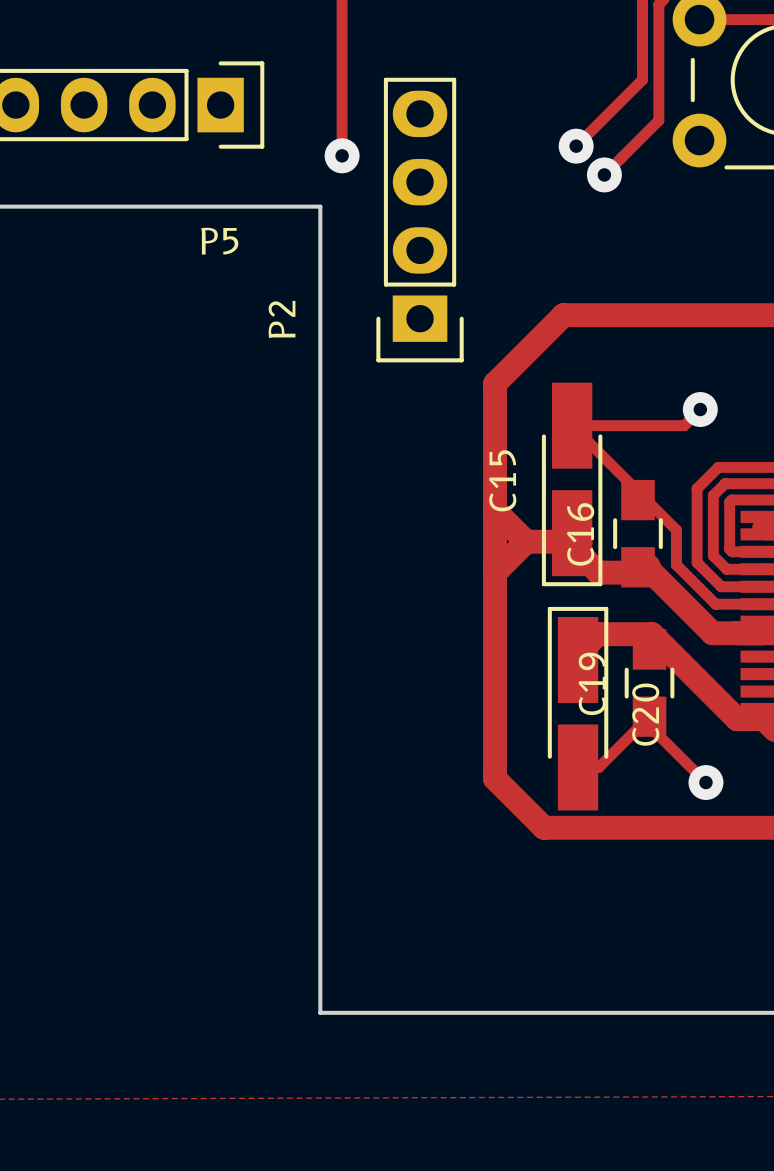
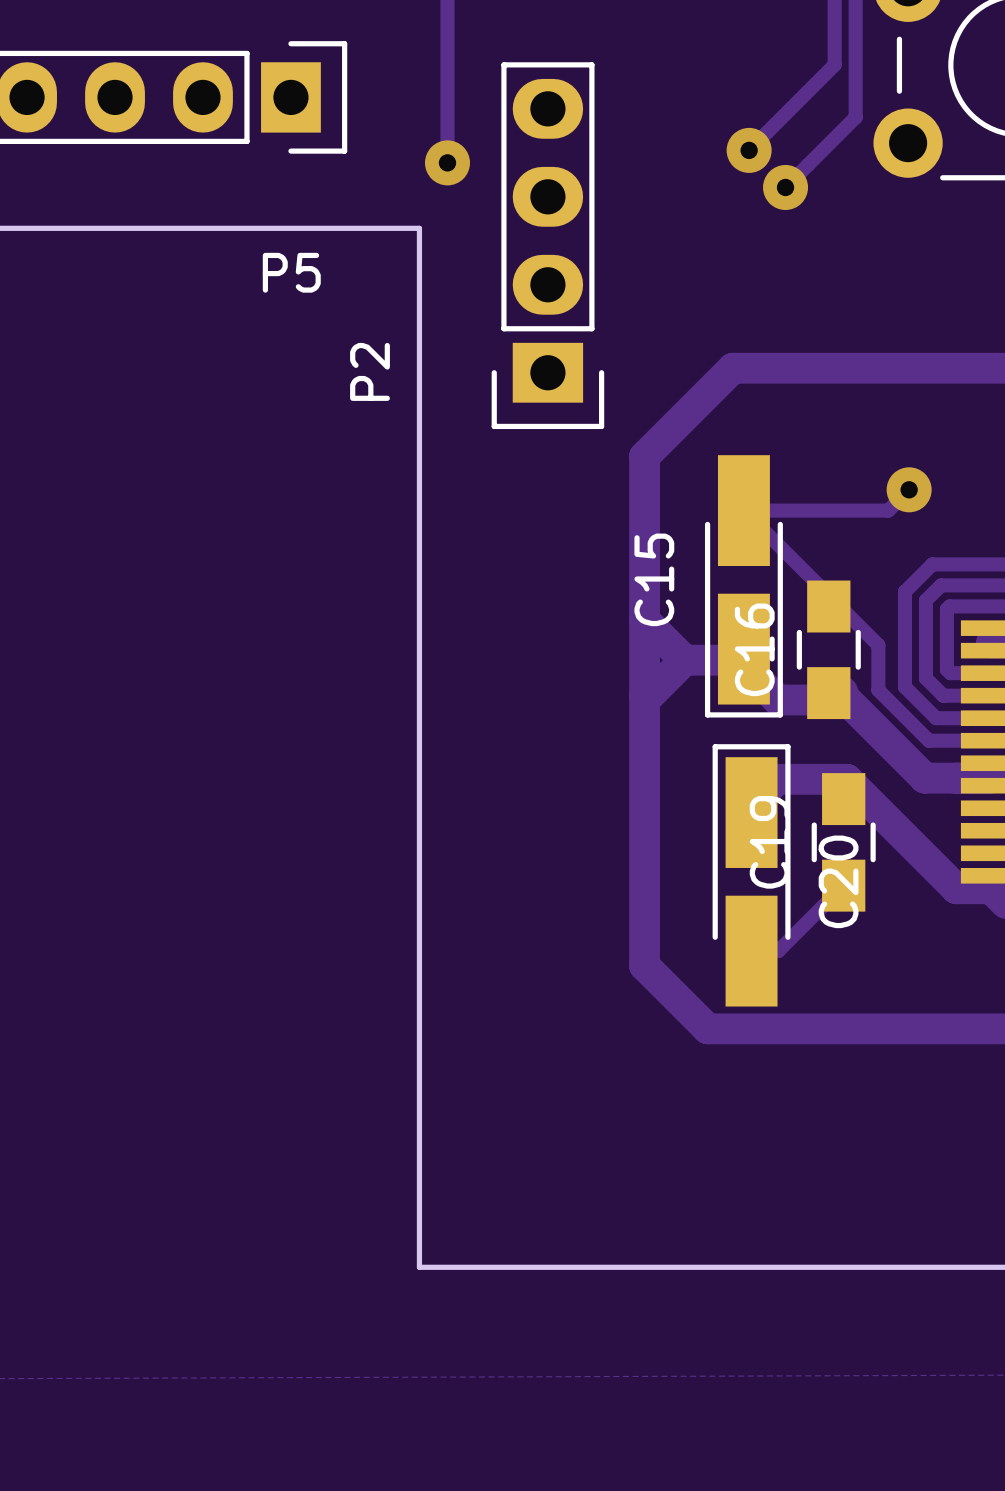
track: (649, 726) (705, 782) -> none
via: (705, 782) -> none

